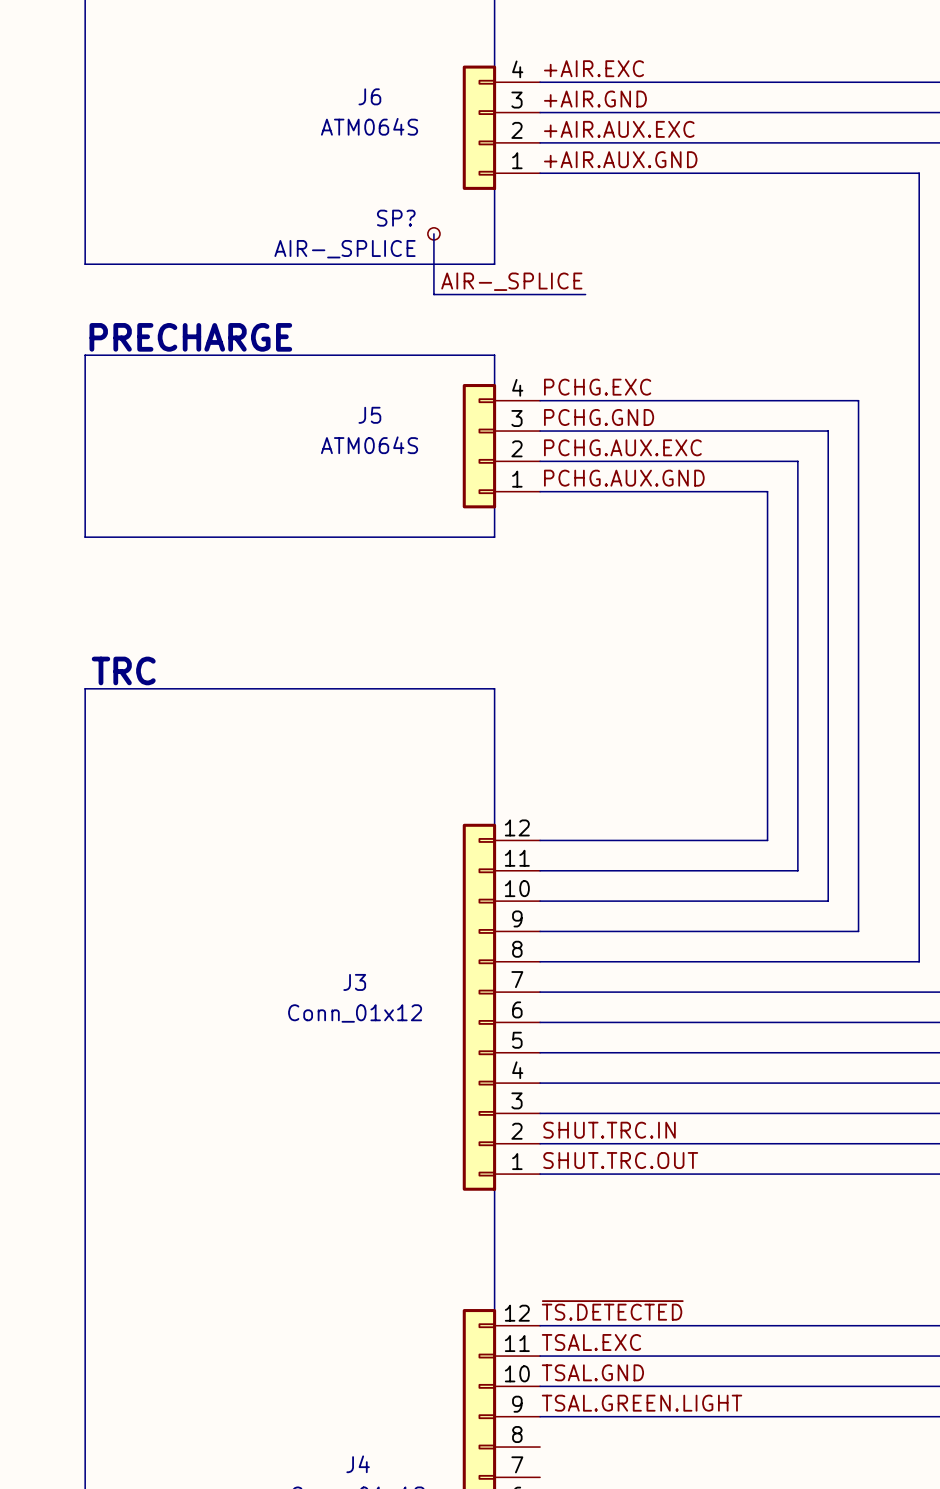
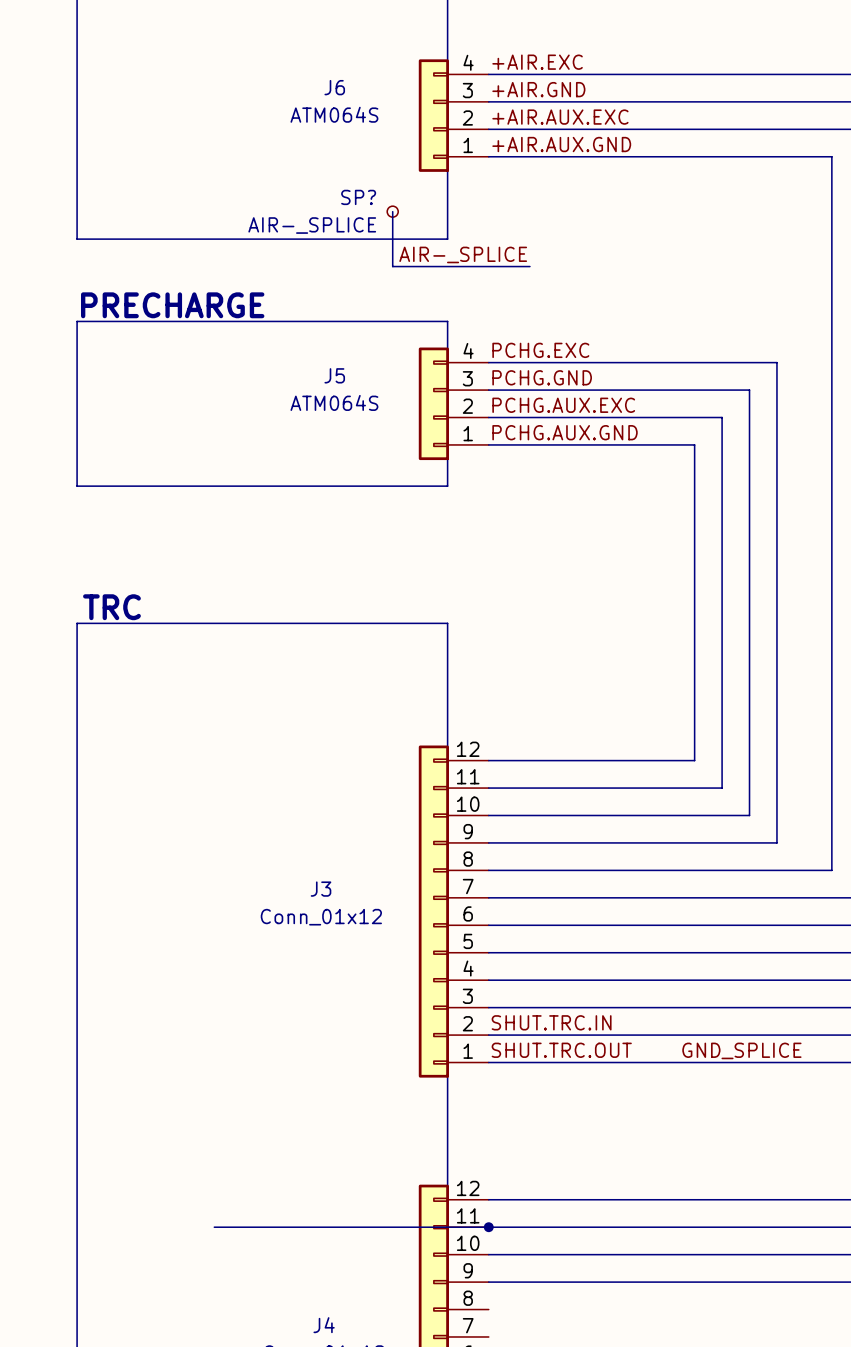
label: none -> GND_SPLICE (741, 1050)
label: ~{TS.DETECTED} (612, 1310) -> none
label: TSAL.EXC (591, 1342) -> none
wire: none -> (214, 1227) (488, 1227)
junction: none -> (488, 1227)
label: TSAL.GND (592, 1372) -> none
label: TSAL.GREEN.LIGHT (642, 1403) -> none

